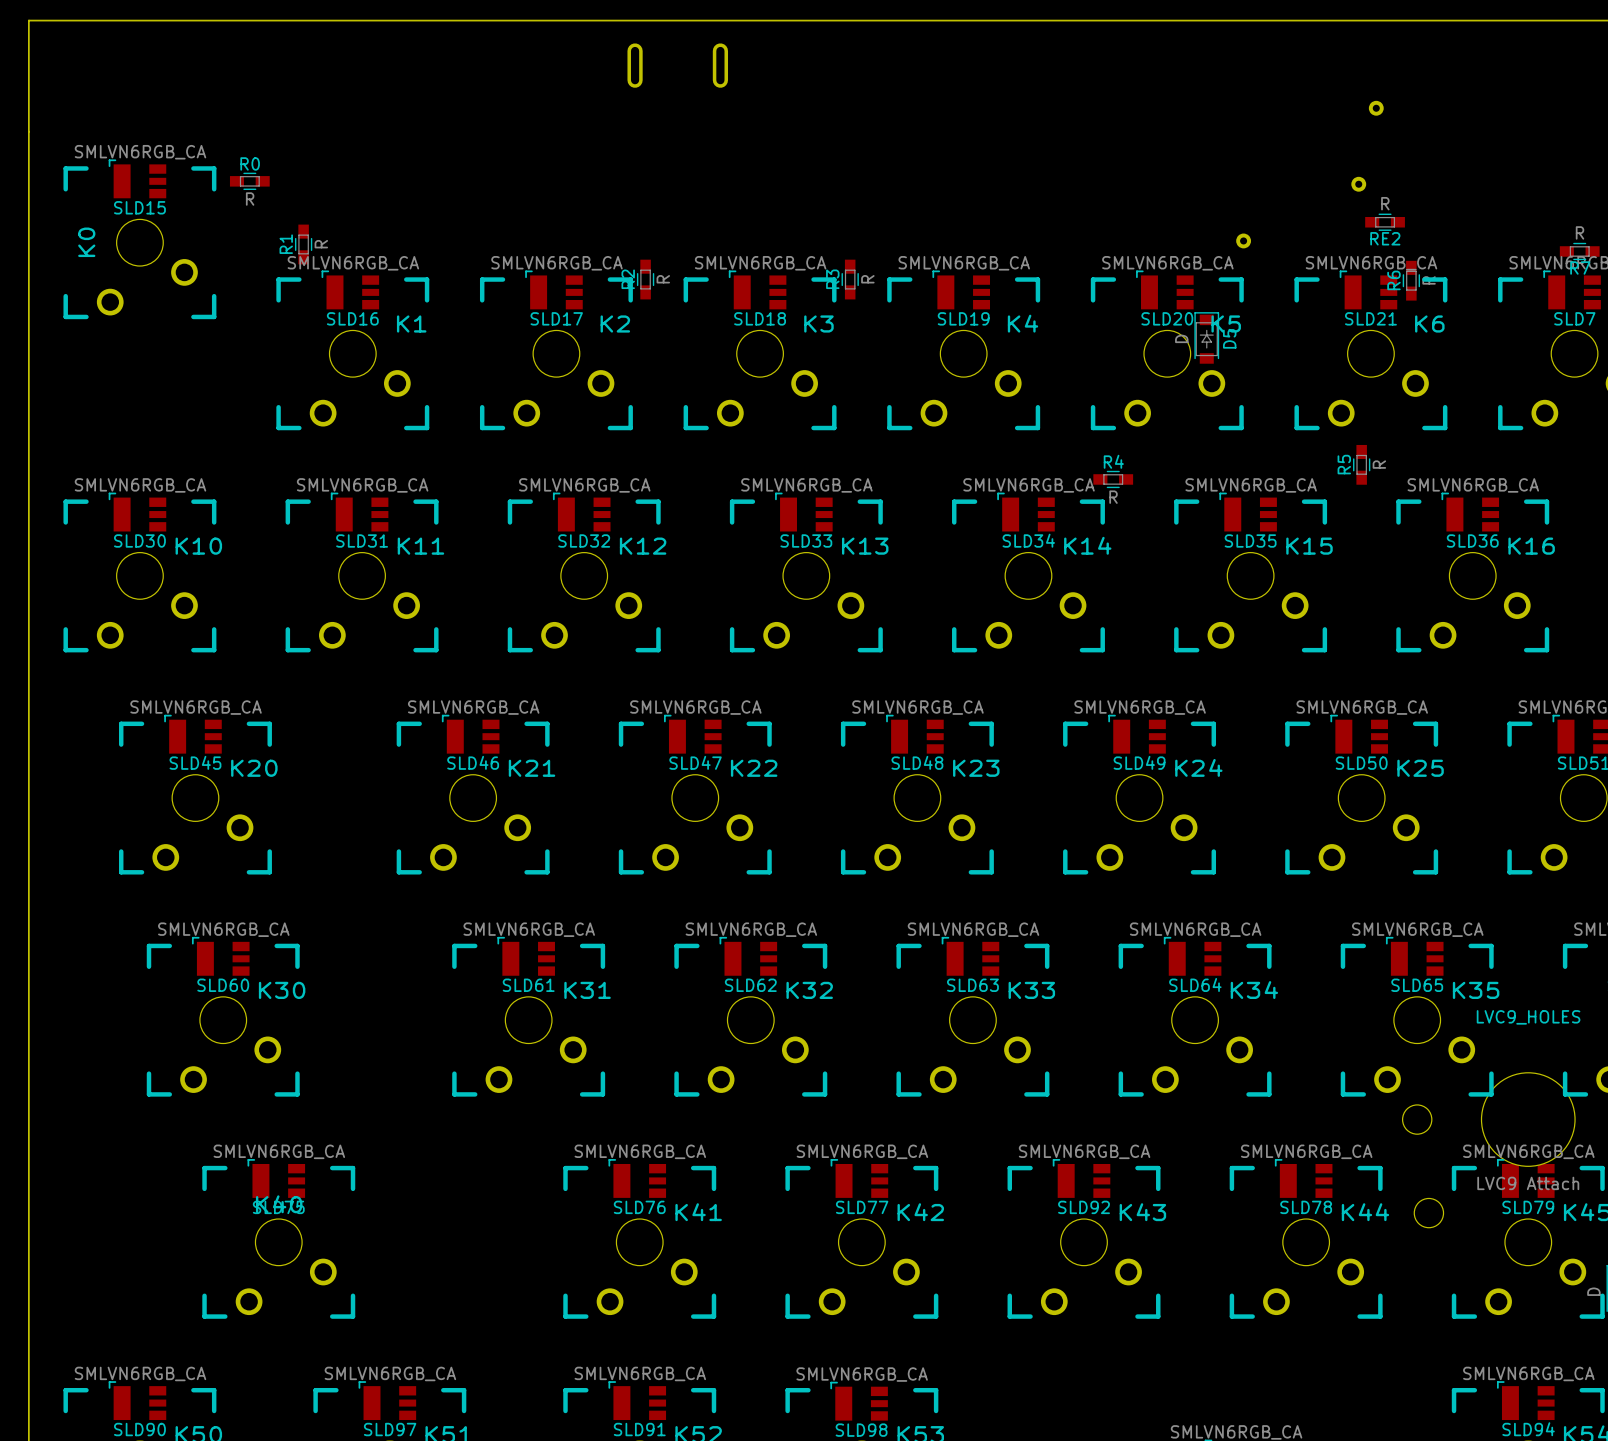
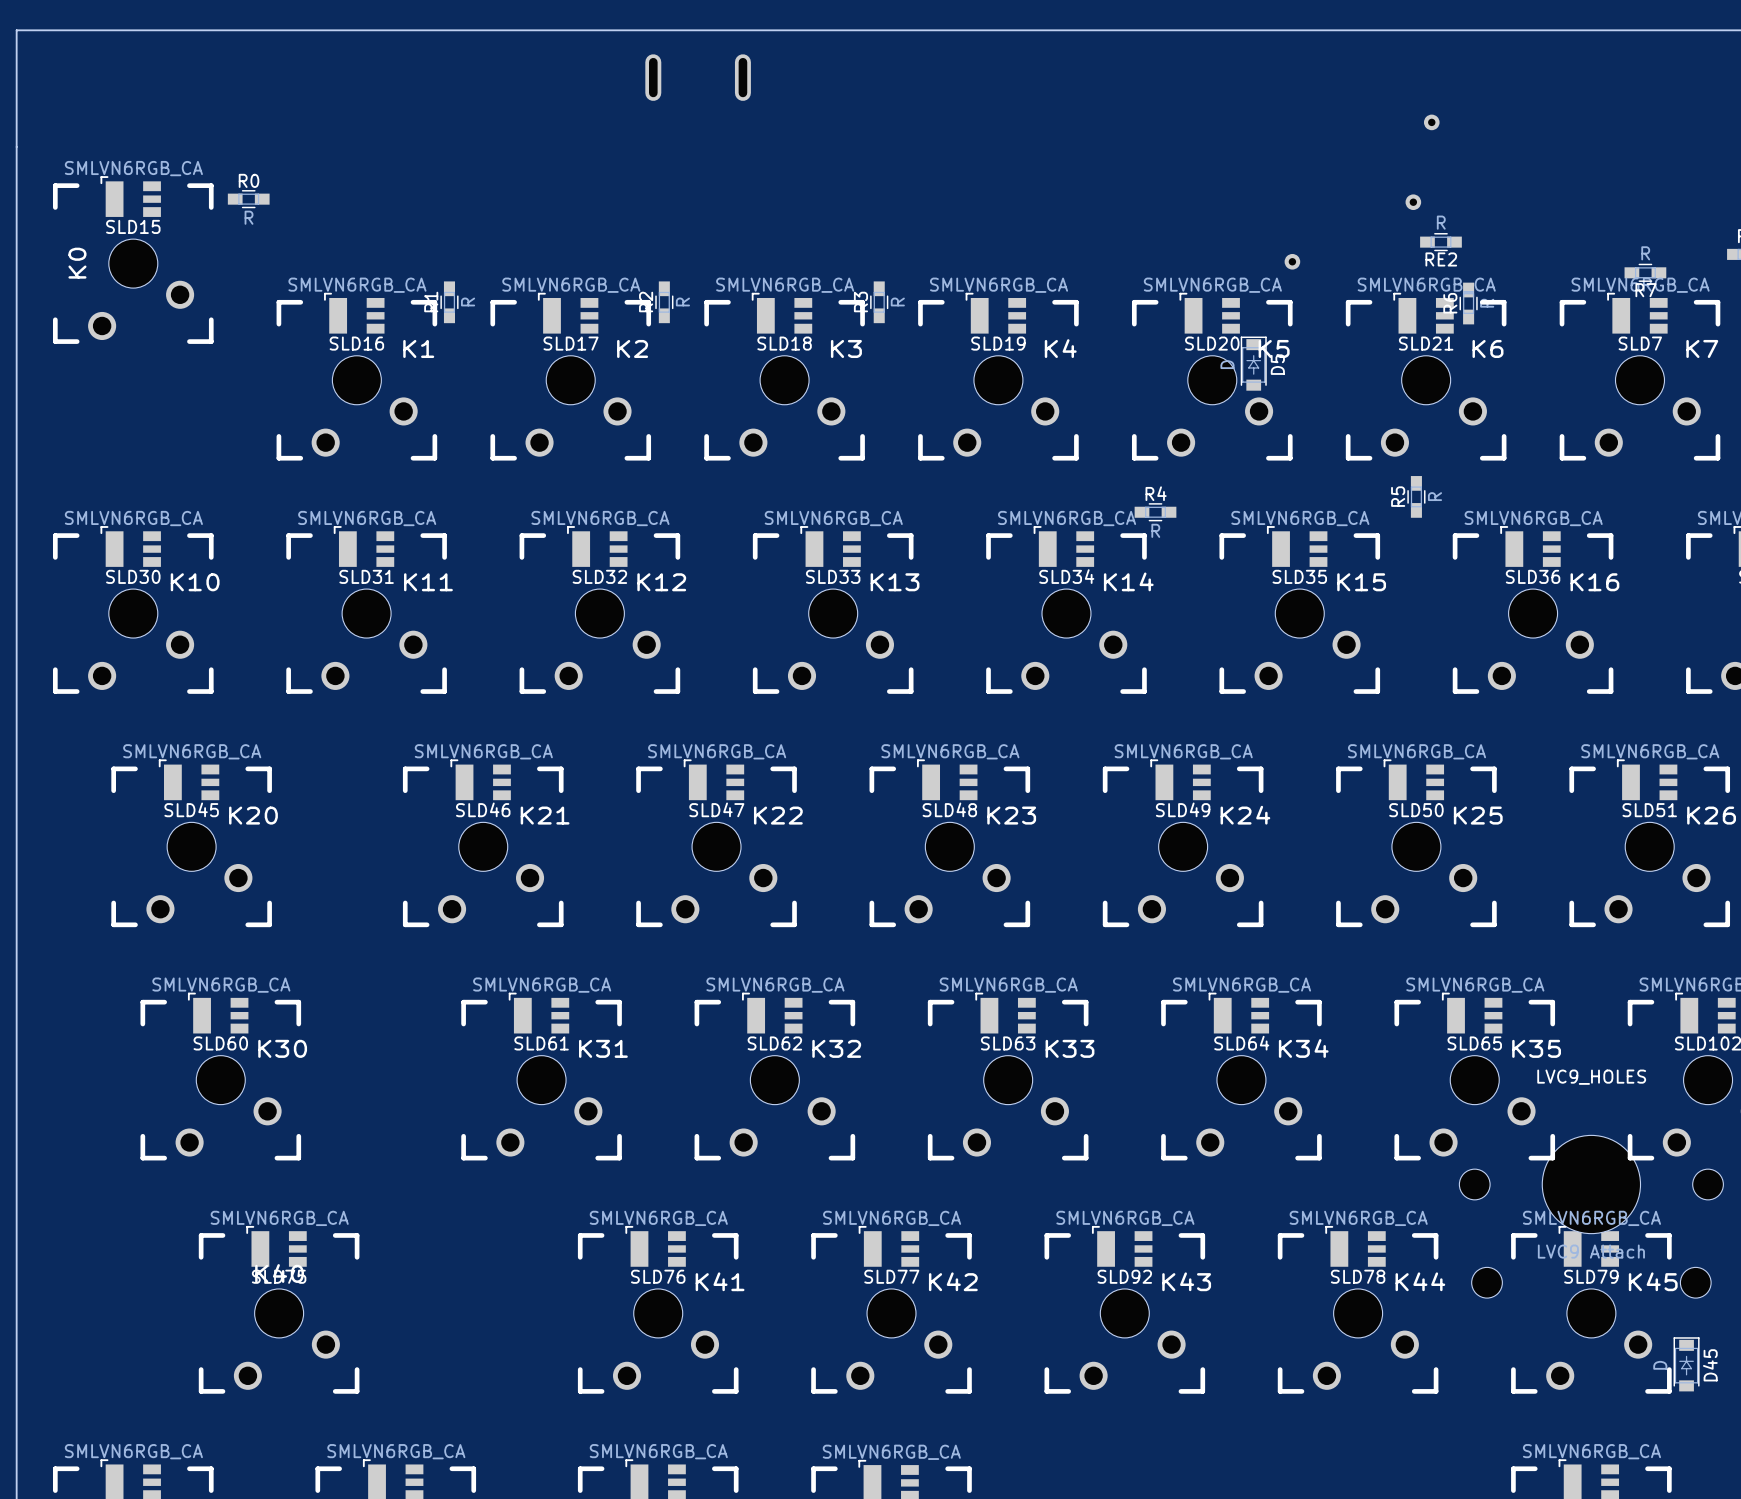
R1 position: (303, 244) -> (449, 302)

